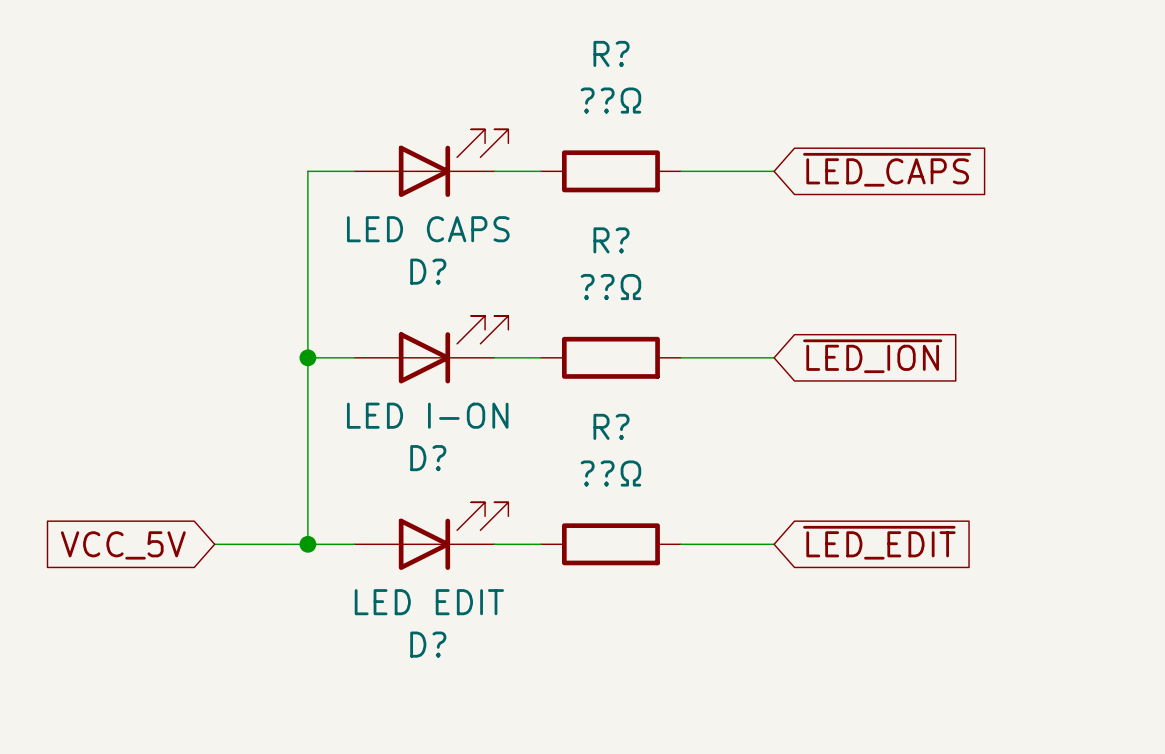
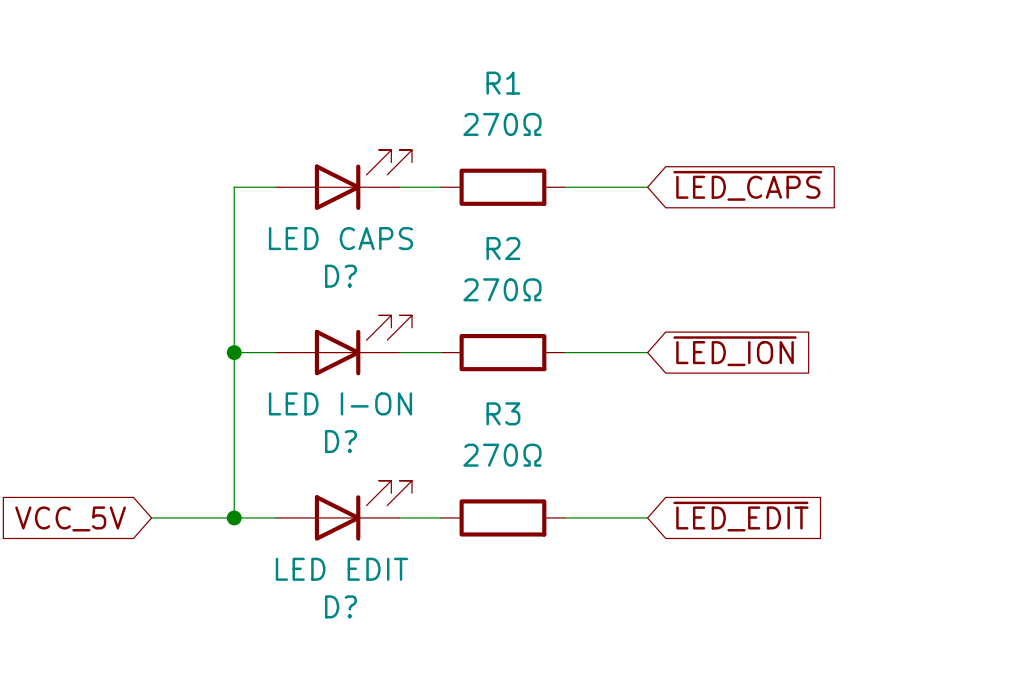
R? name: R? (611, 53) -> R1 (503, 83)
R? value: ??Ω (610, 100) -> 270Ω (502, 124)
R? name: R? (611, 240) -> R2 (503, 248)
R? value: ??Ω (610, 287) -> 270Ω (502, 289)
R? name: R? (611, 426) -> R3 (503, 413)
R? value: ??Ω (610, 473) -> 270Ω (502, 455)

